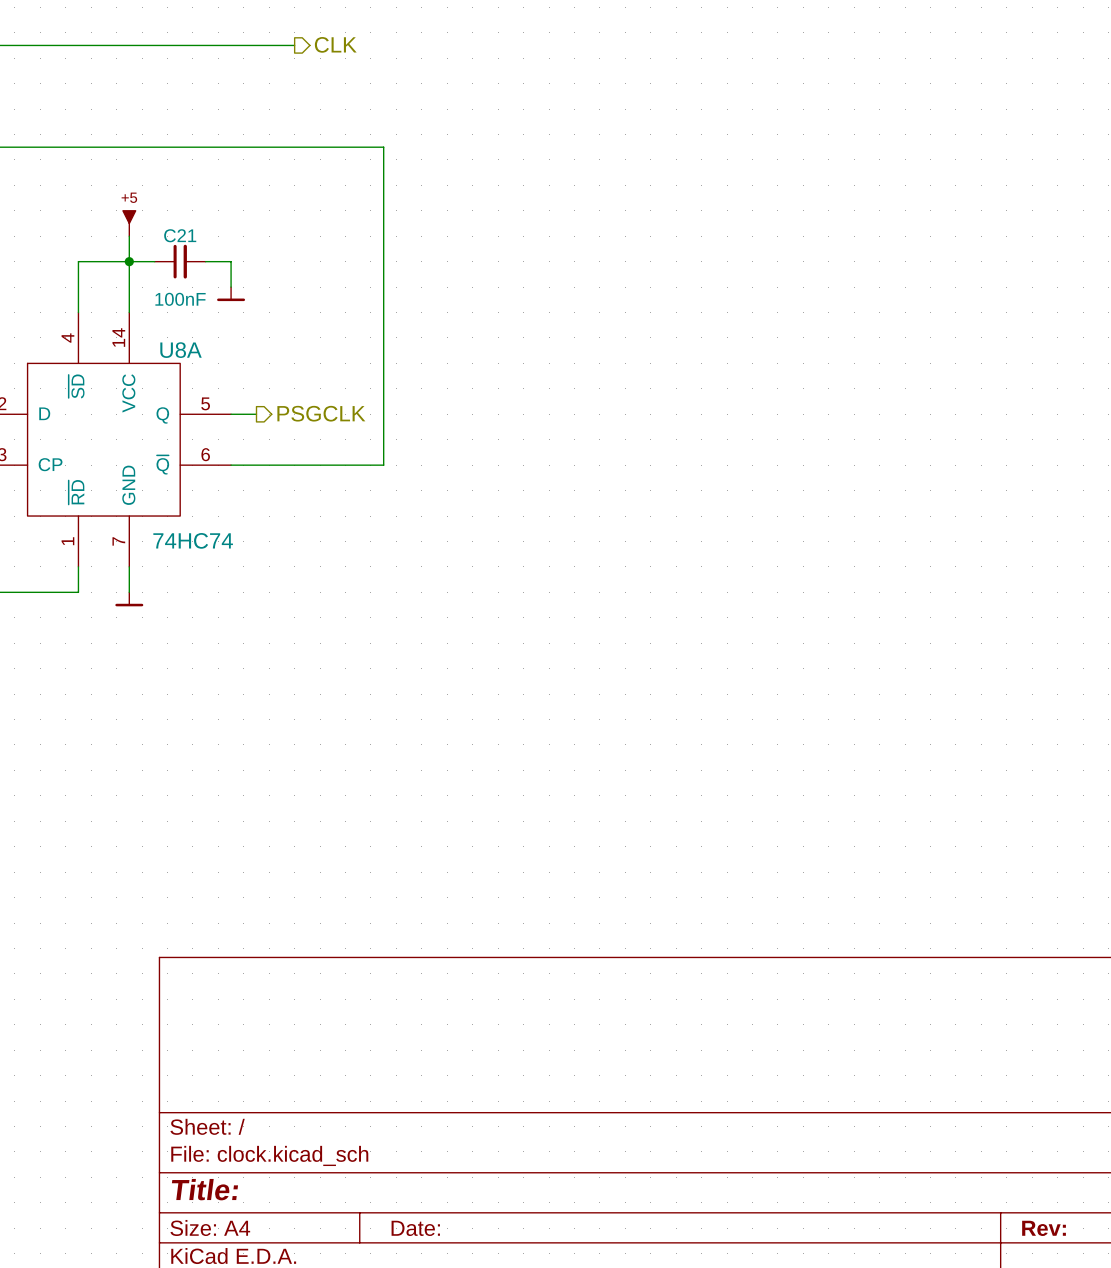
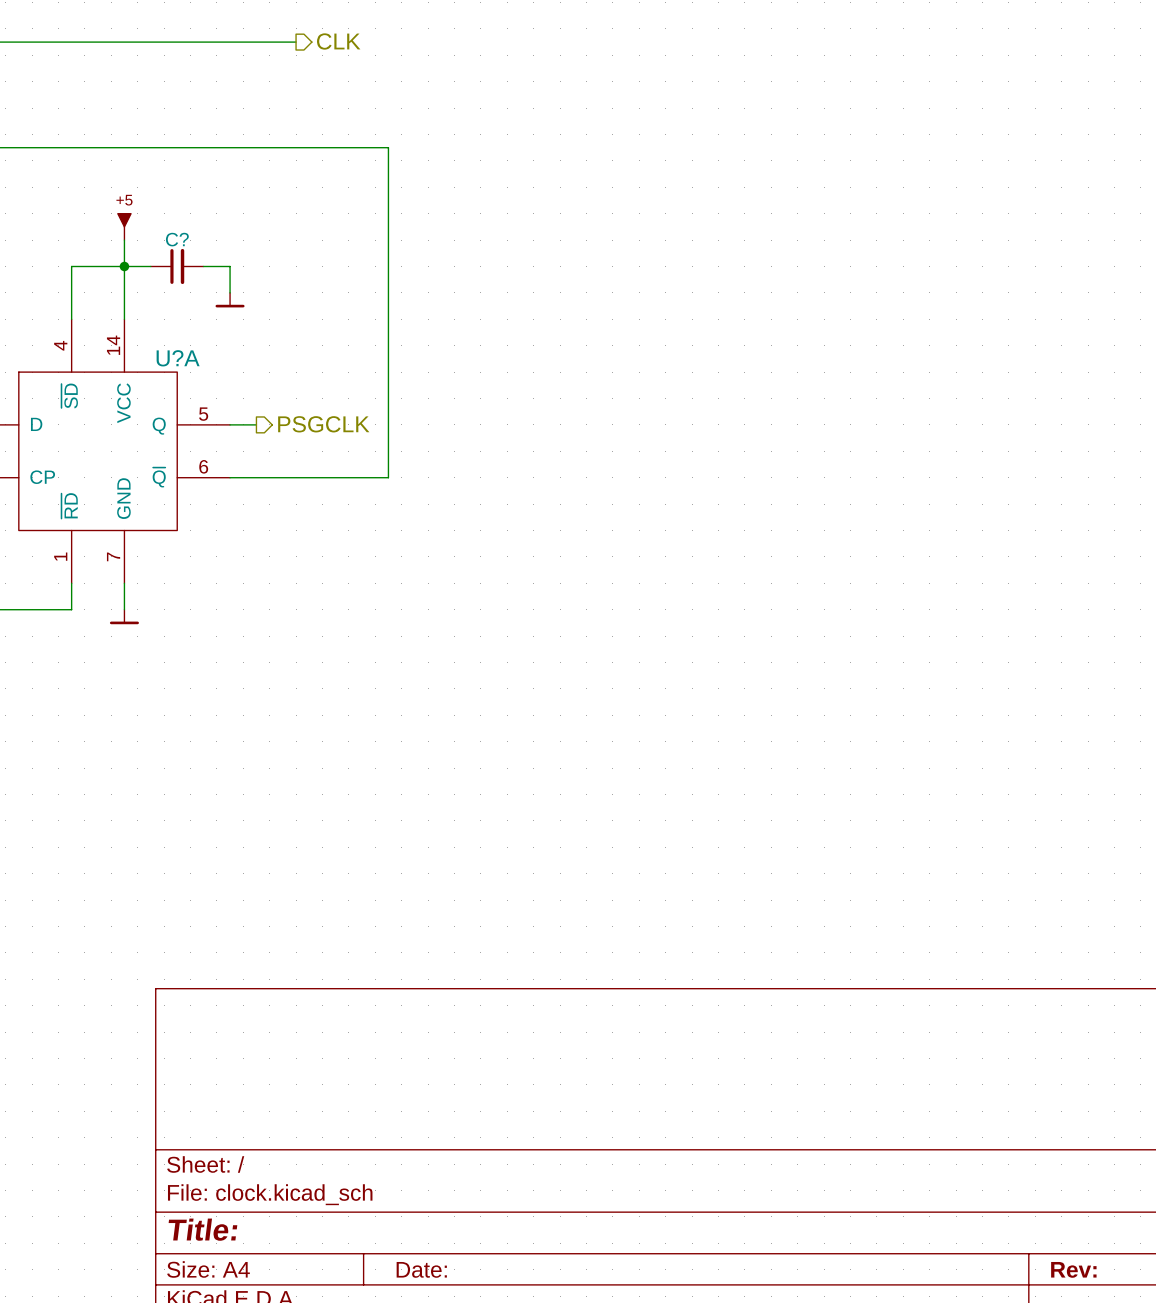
C21 name: C21 (180, 235) -> C? (177, 239)
C21 value: 100nF (180, 299) -> none
U8A name: U8A (181, 350) -> U?A (178, 358)
U8A value: 74HC74 (193, 540) -> none

